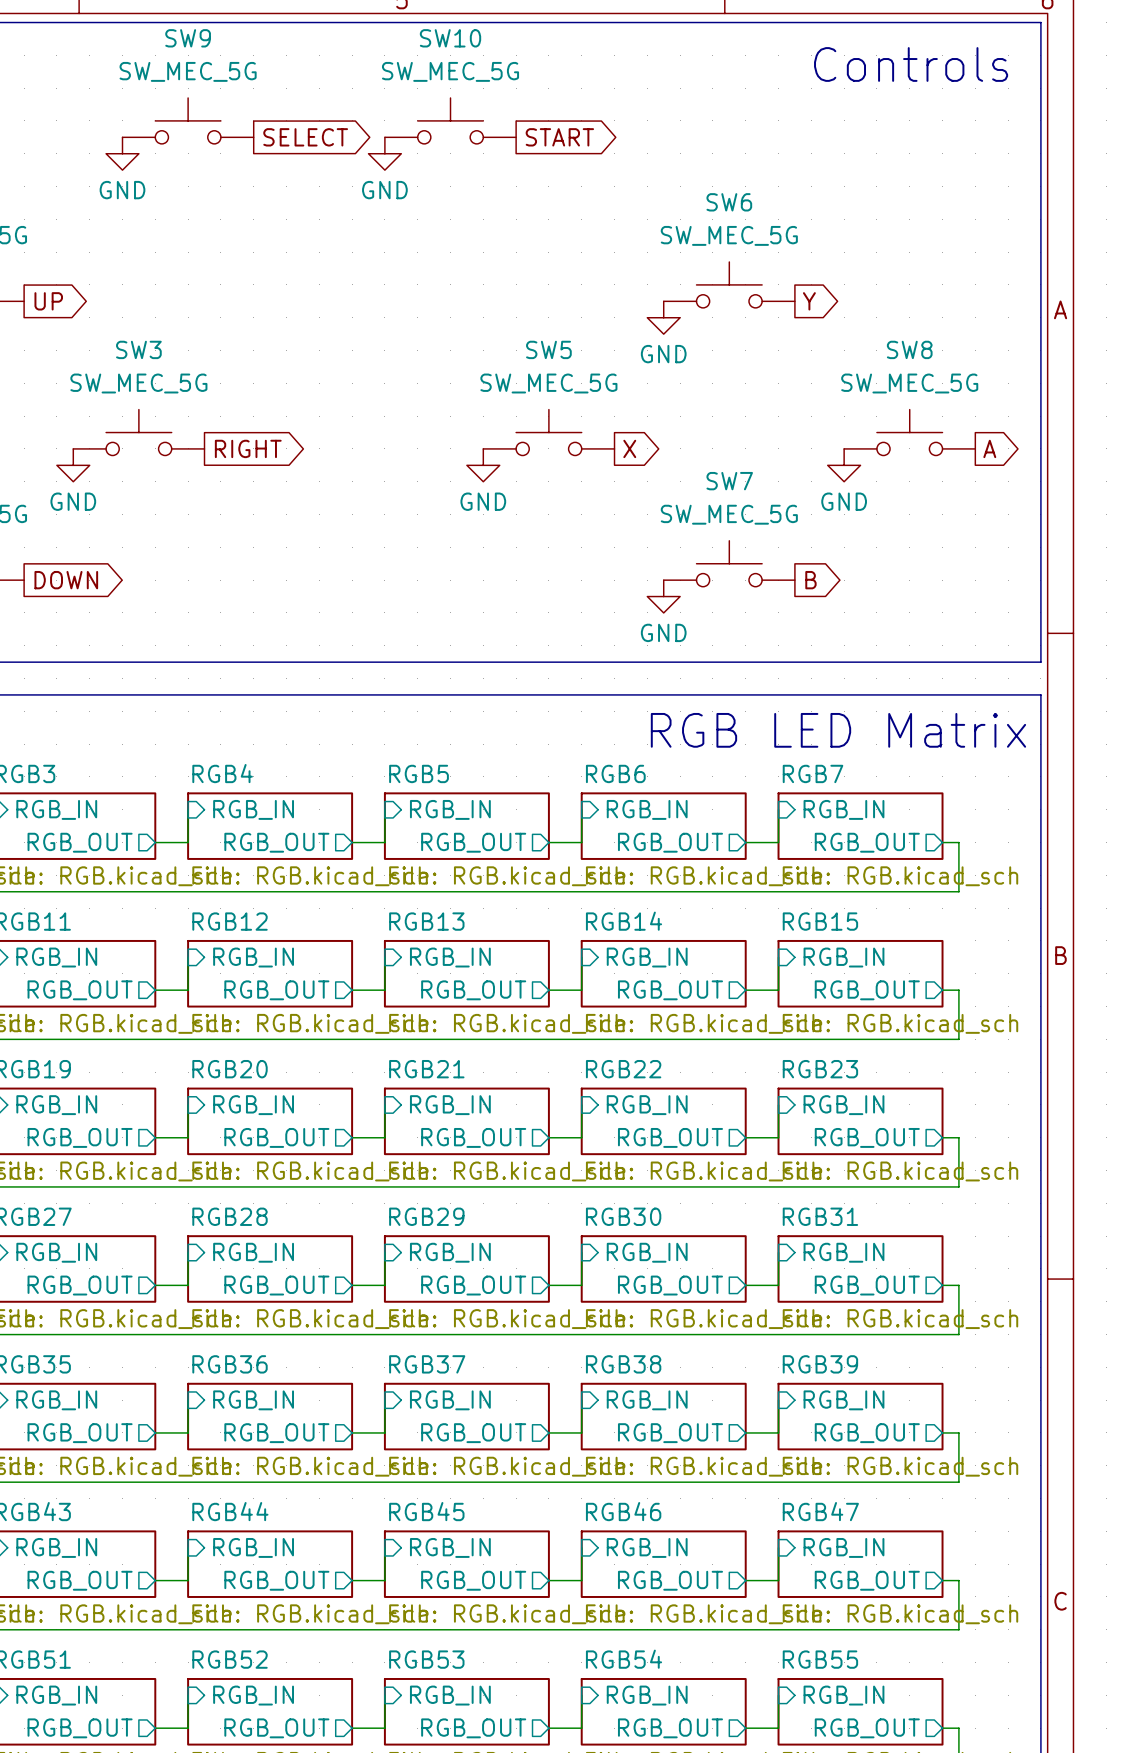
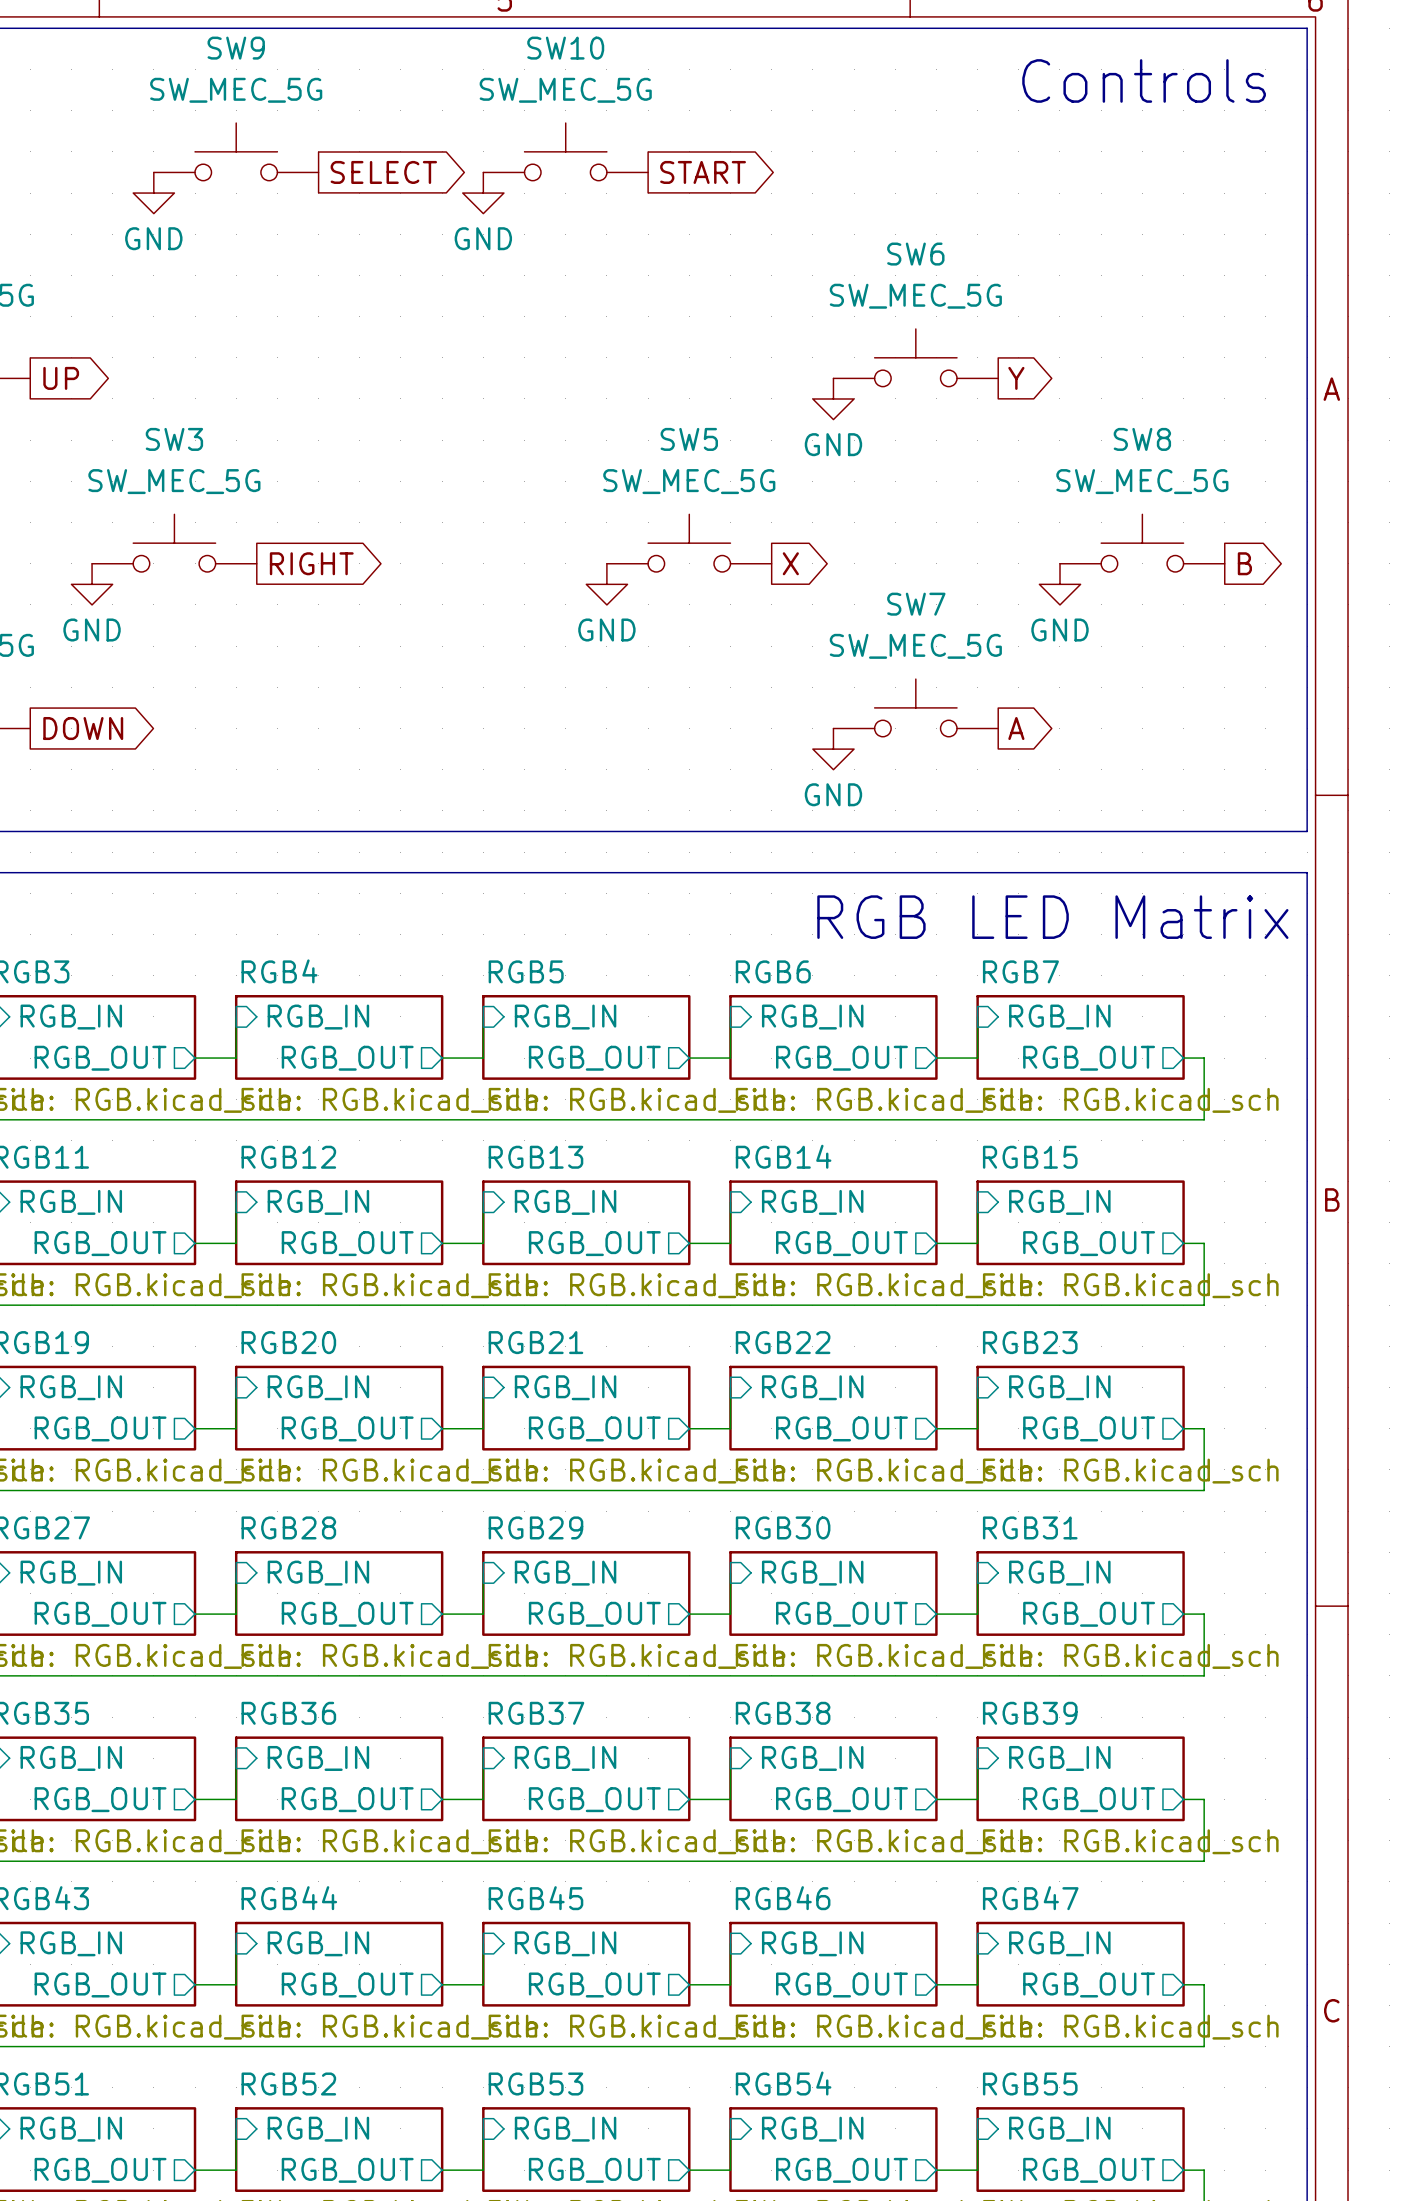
global label: A (989, 448) -> B (1244, 563)
global label: B (810, 580) -> A (1016, 728)

